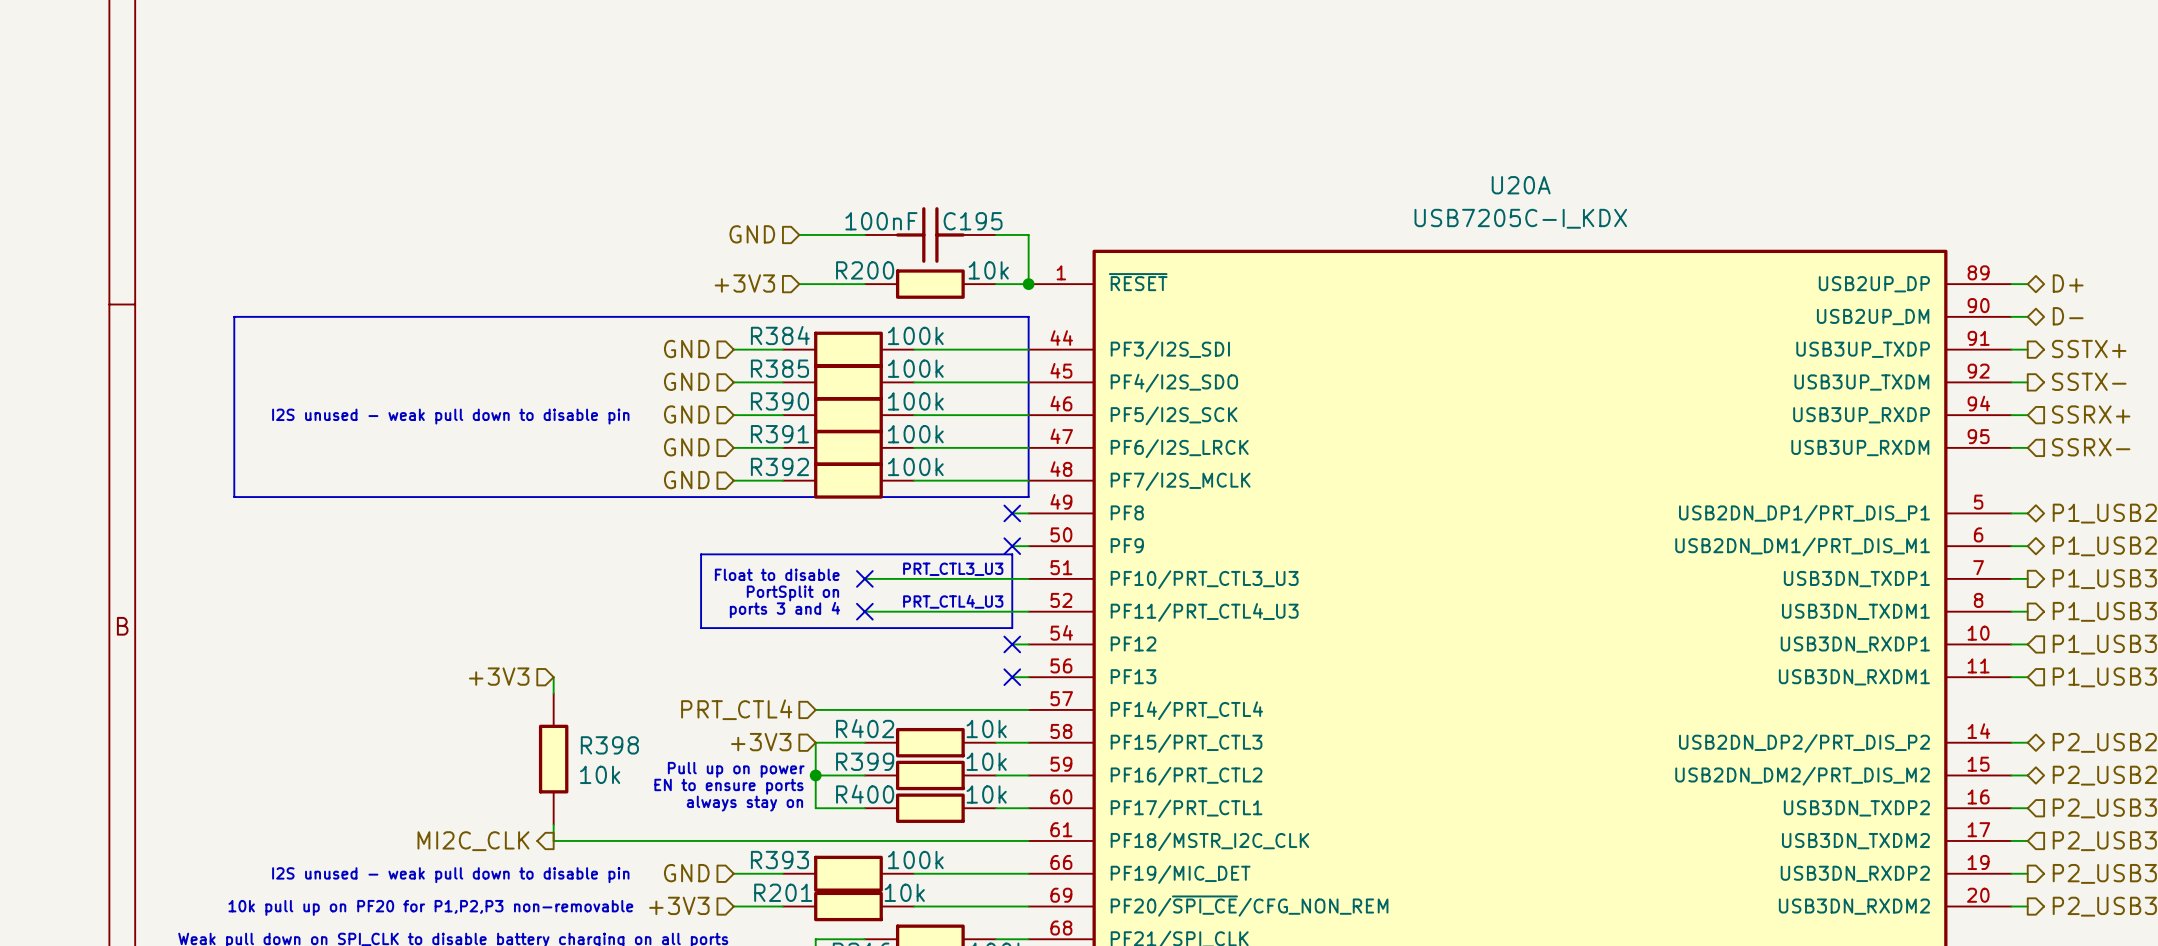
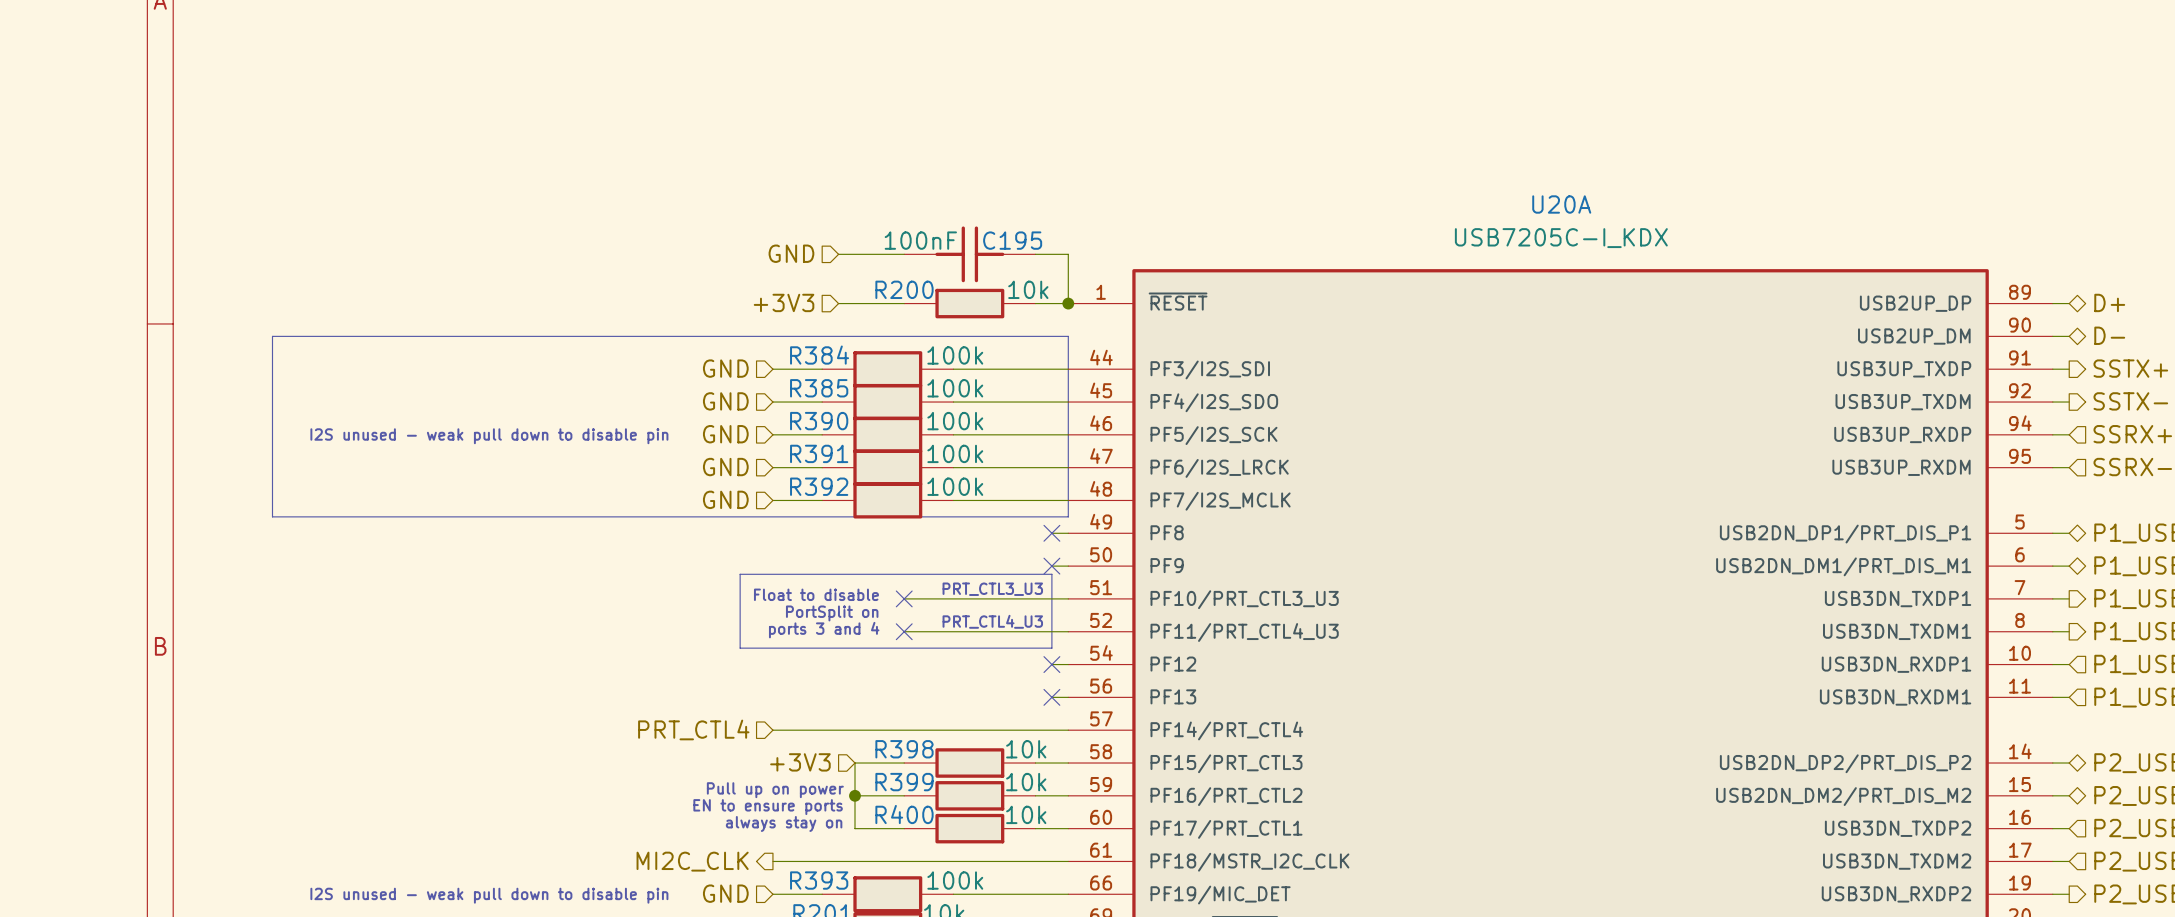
hierarchical label: +3V3 (499, 676) -> none
wire: (553, 677) (553, 693) -> none
wire: none -> (772, 730) (854, 730)
hierarchical label position: PRT_CTL4 (736, 709) -> PRT_CTL4 (693, 729)
R402 name: R402 (865, 728) -> R398 (904, 749)
R398: 10k (553, 759) -> none
wire: (553, 824) (553, 840) (733, 840) -> none
hierarchical label position: MI2C_CLK (473, 841) -> MI2C_CLK (692, 861)

